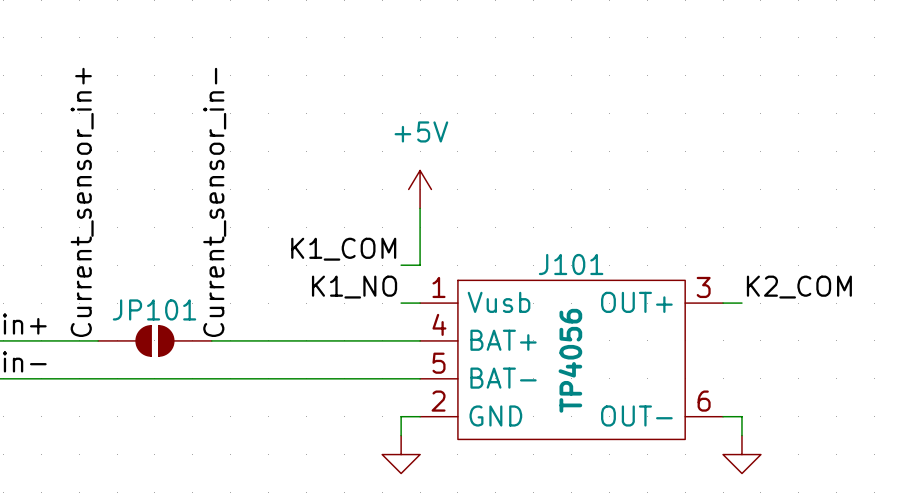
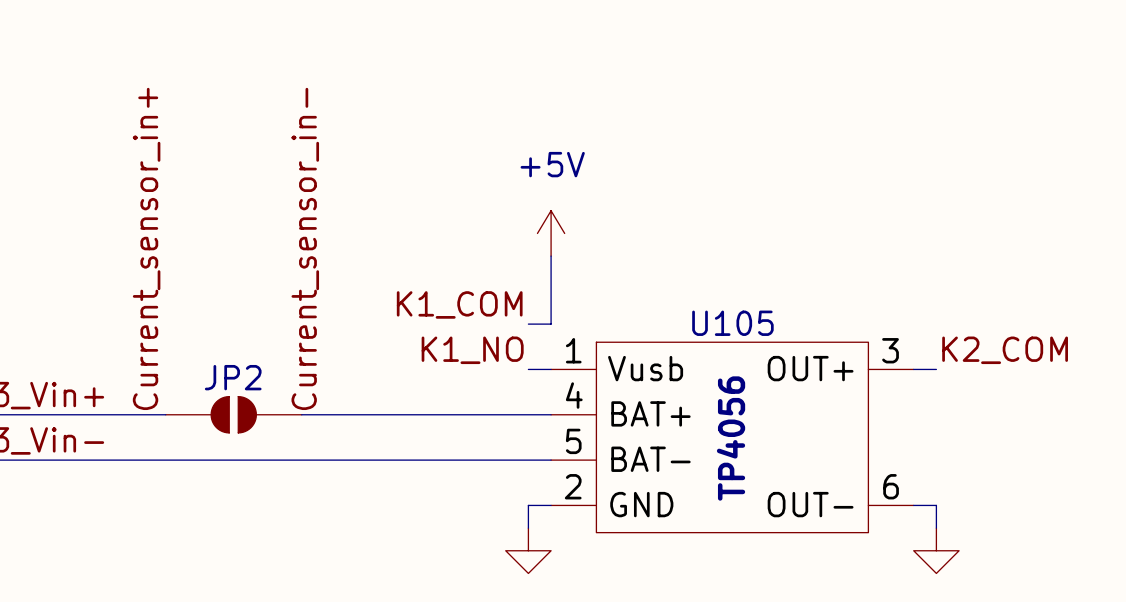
J101 name: J101 (571, 264) -> U105 (732, 323)
JP101 name: JP101 (154, 309) -> JP2 (233, 377)

